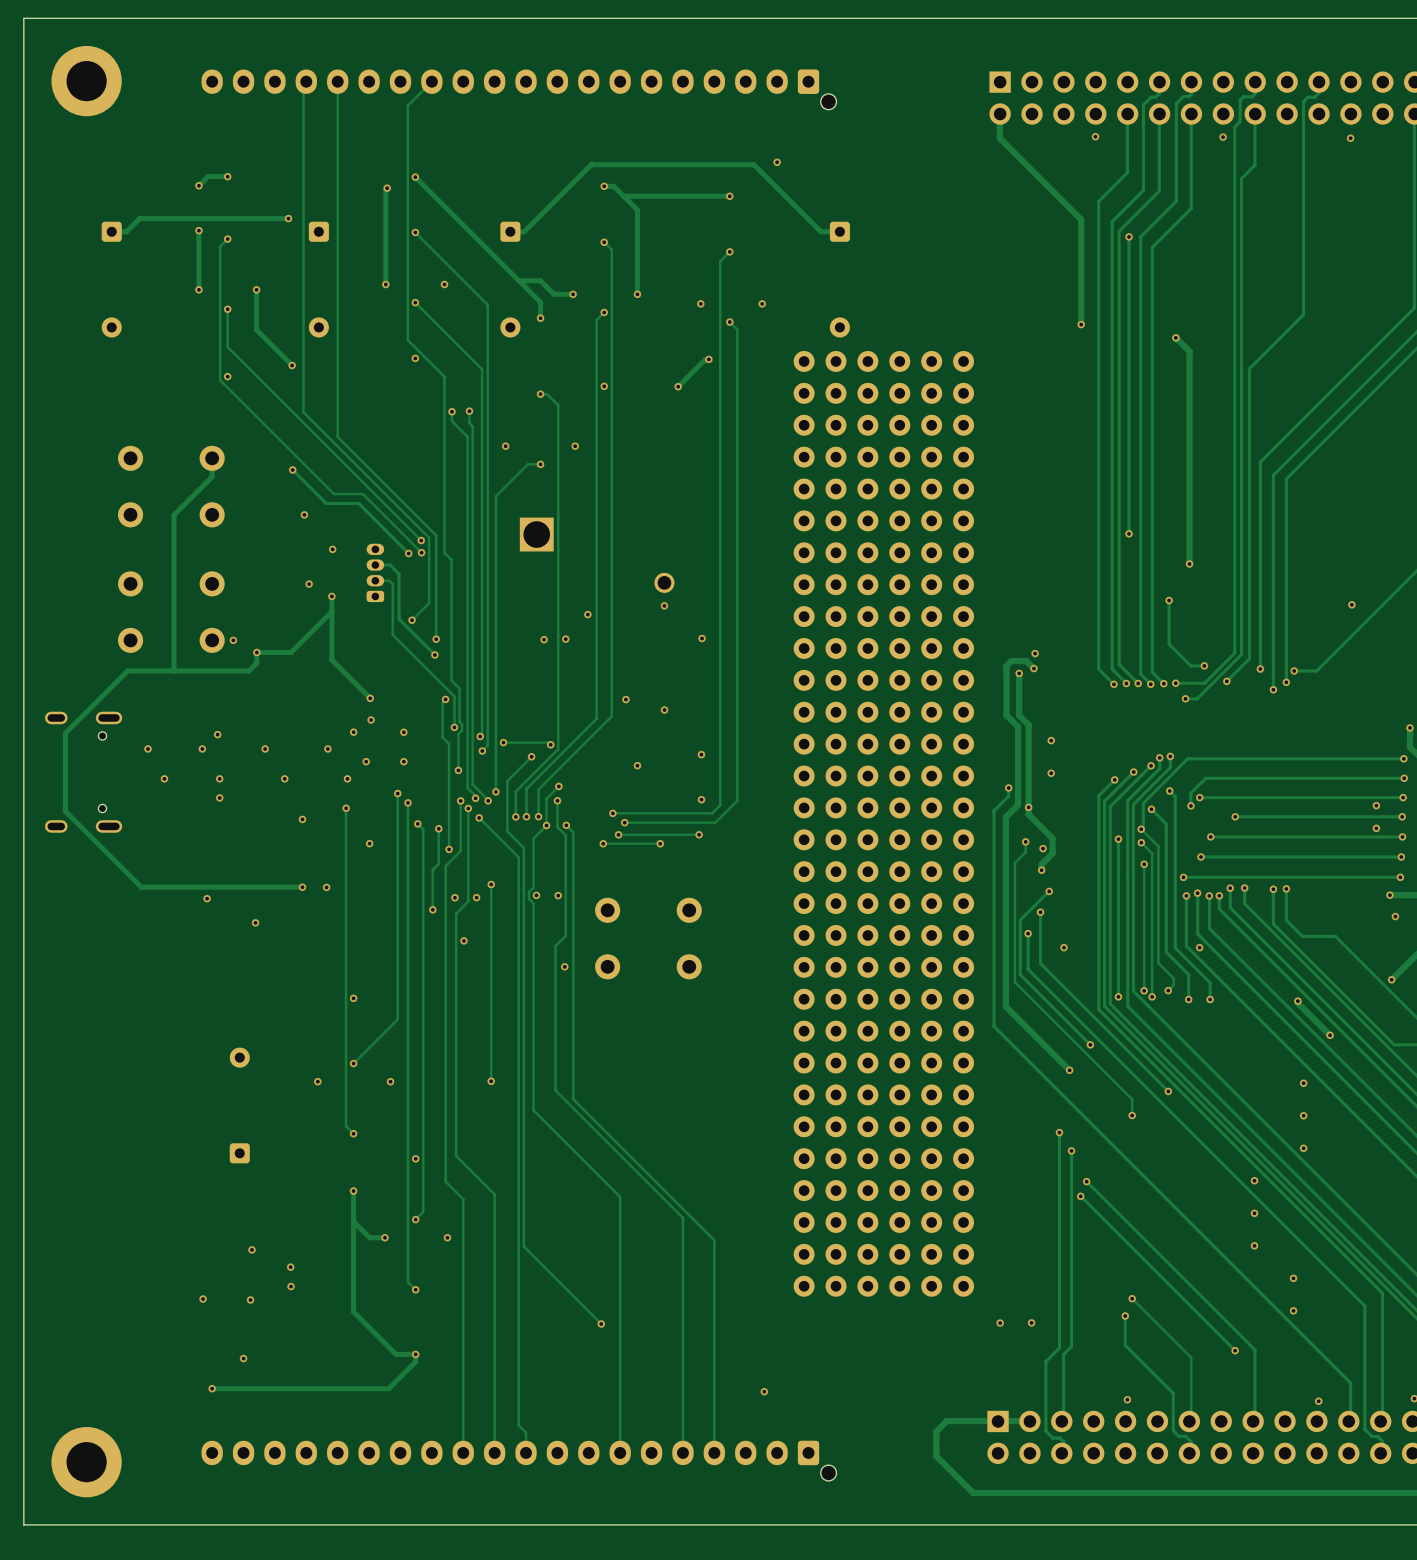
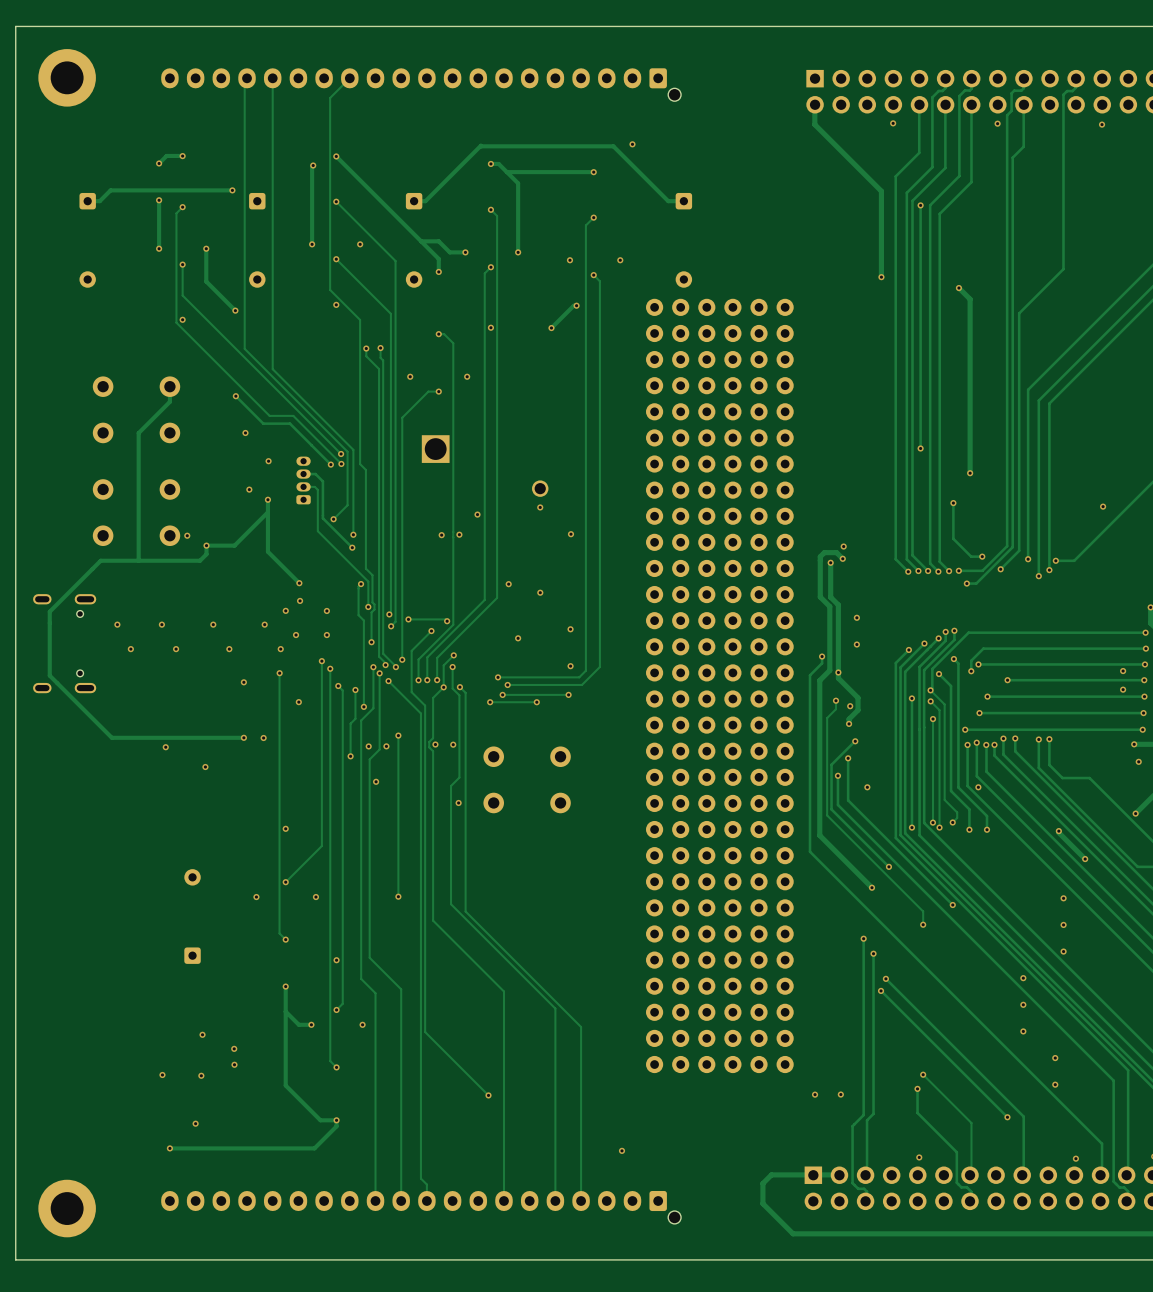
via: (217, 734) -> none
via: (219, 797) -> none

